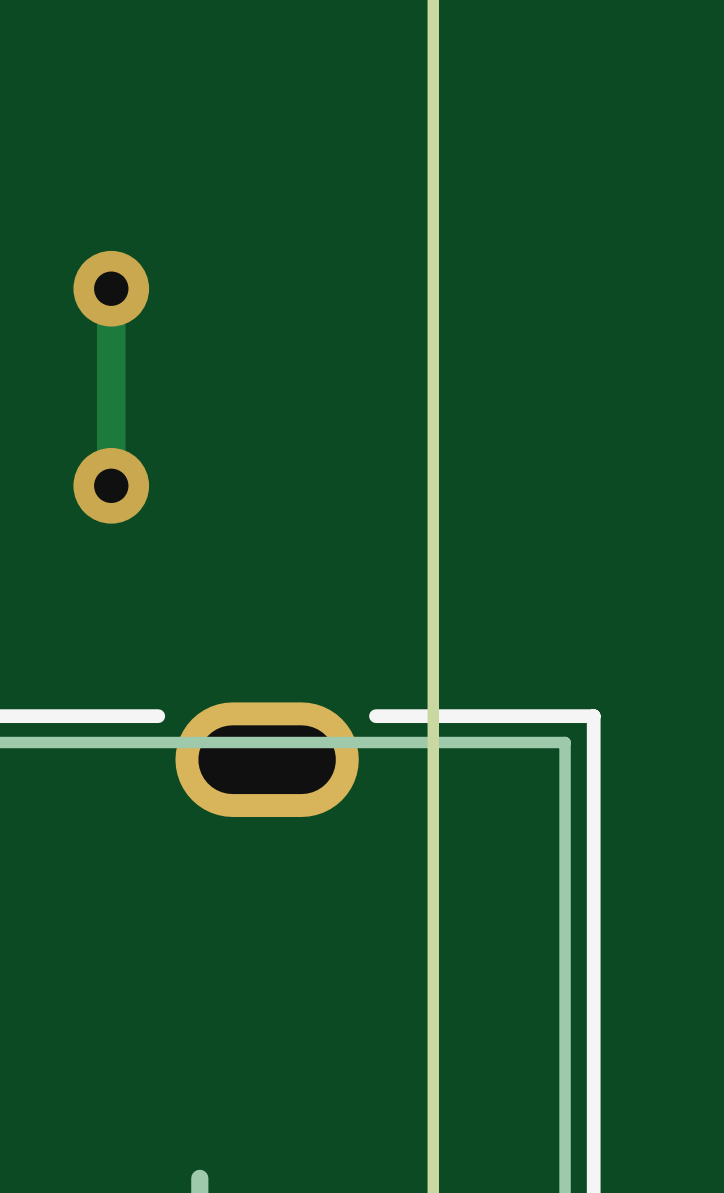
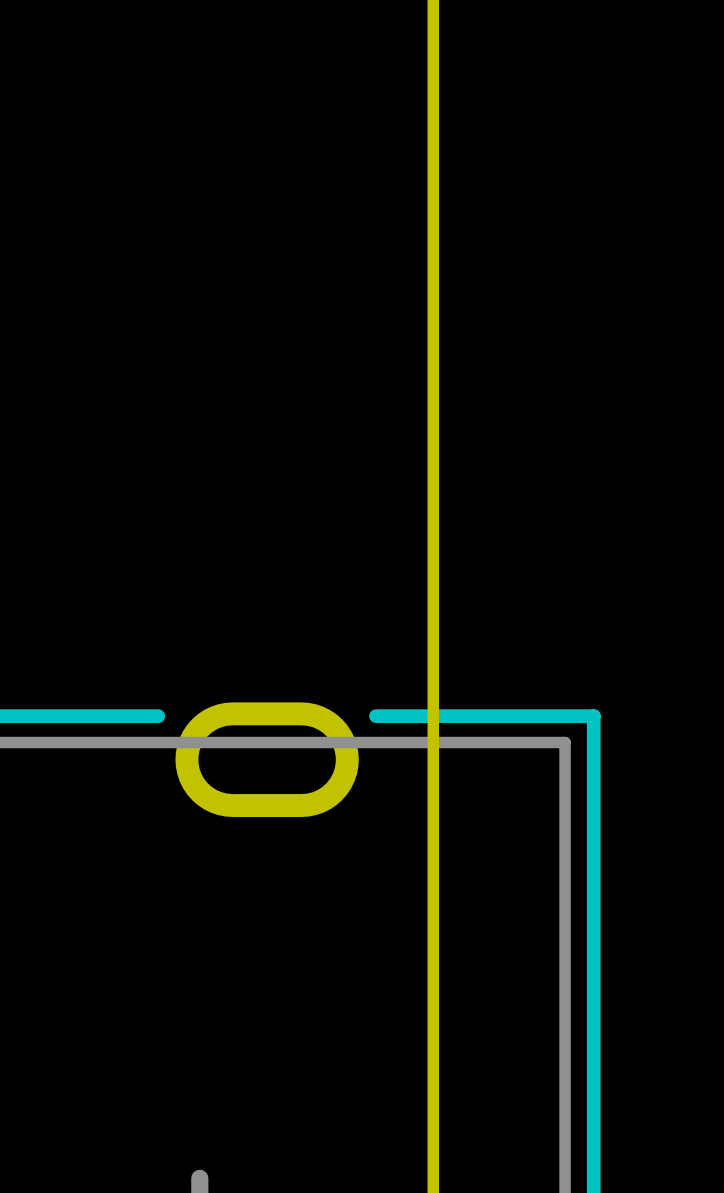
track: (111, 288) (111, 485) -> none
via: (111, 288) -> none
via: (111, 485) -> none

